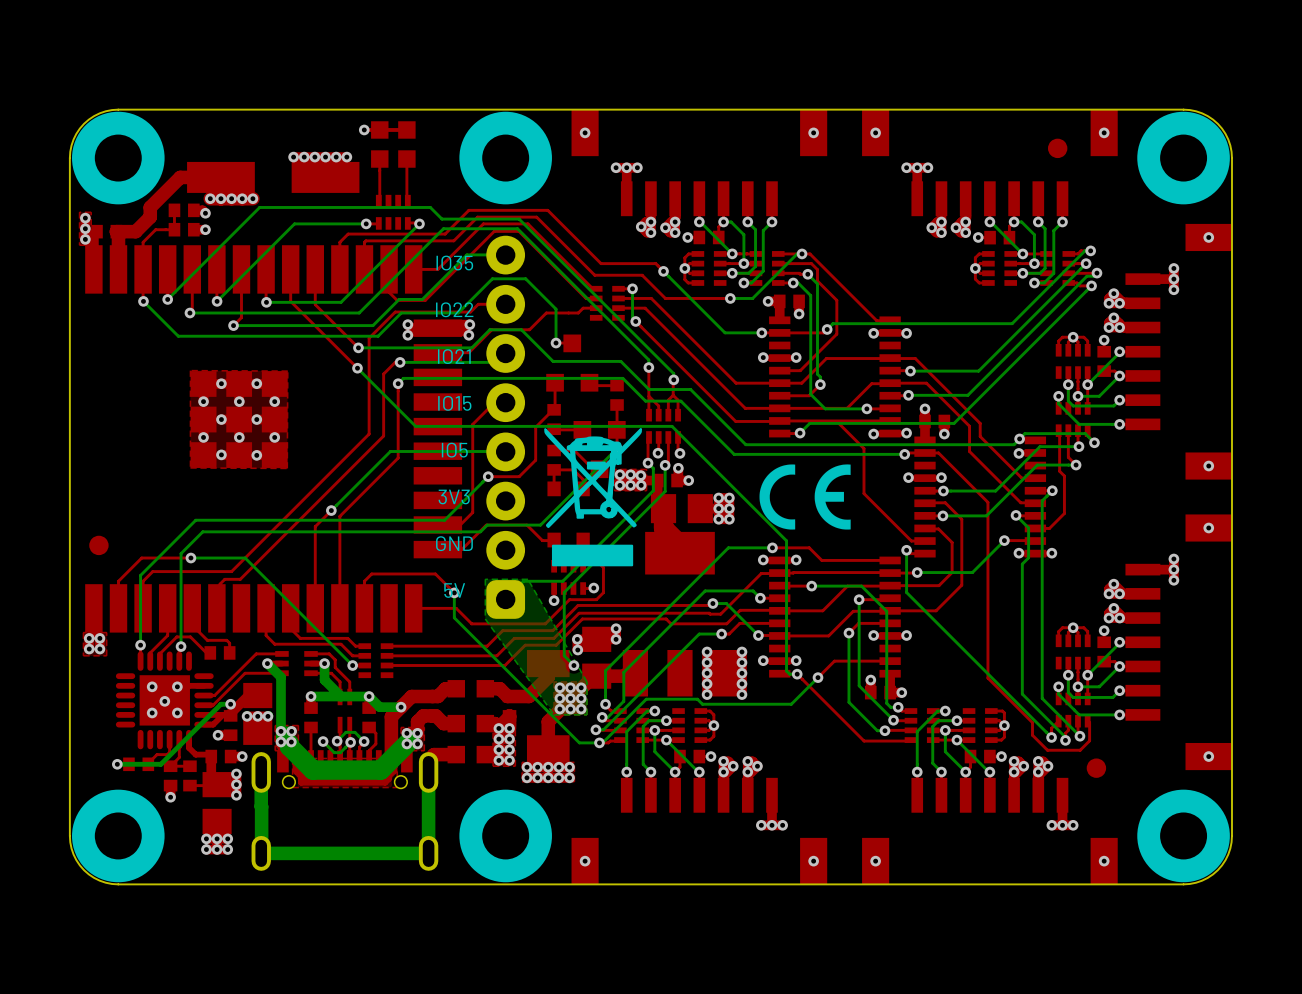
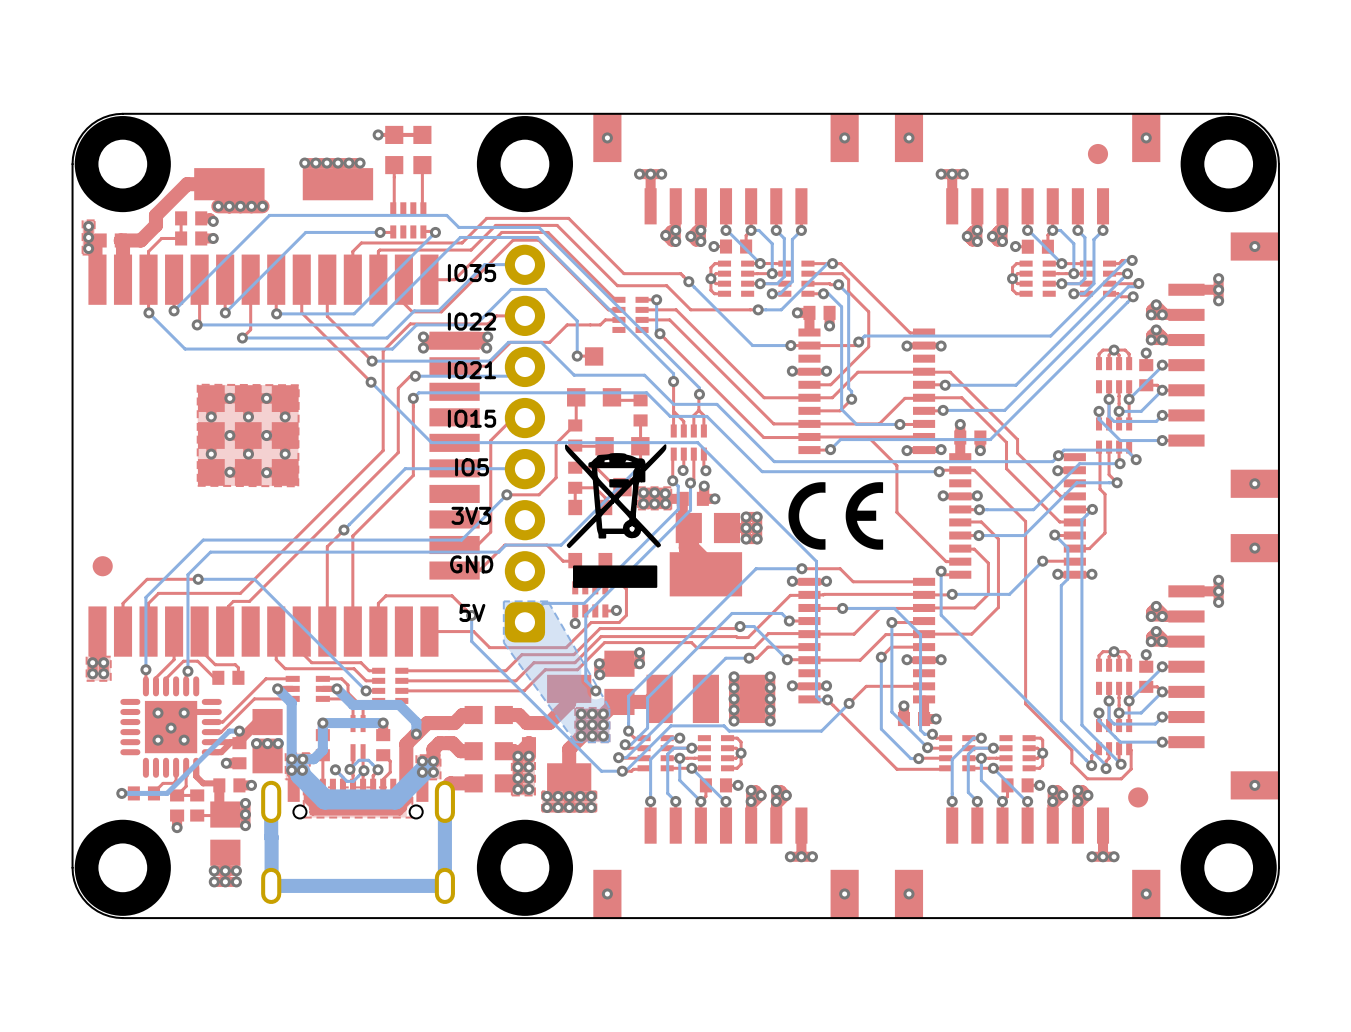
bottom track: (324, 663) (324, 680) (341, 696) -> none
bottom track: none -> (322, 723) (322, 750) (313, 759) (302, 759)
bottom track: (369, 696) (379, 707) (401, 707) -> (336, 688) (353, 704) (399, 704) (416, 722) (416, 734)

